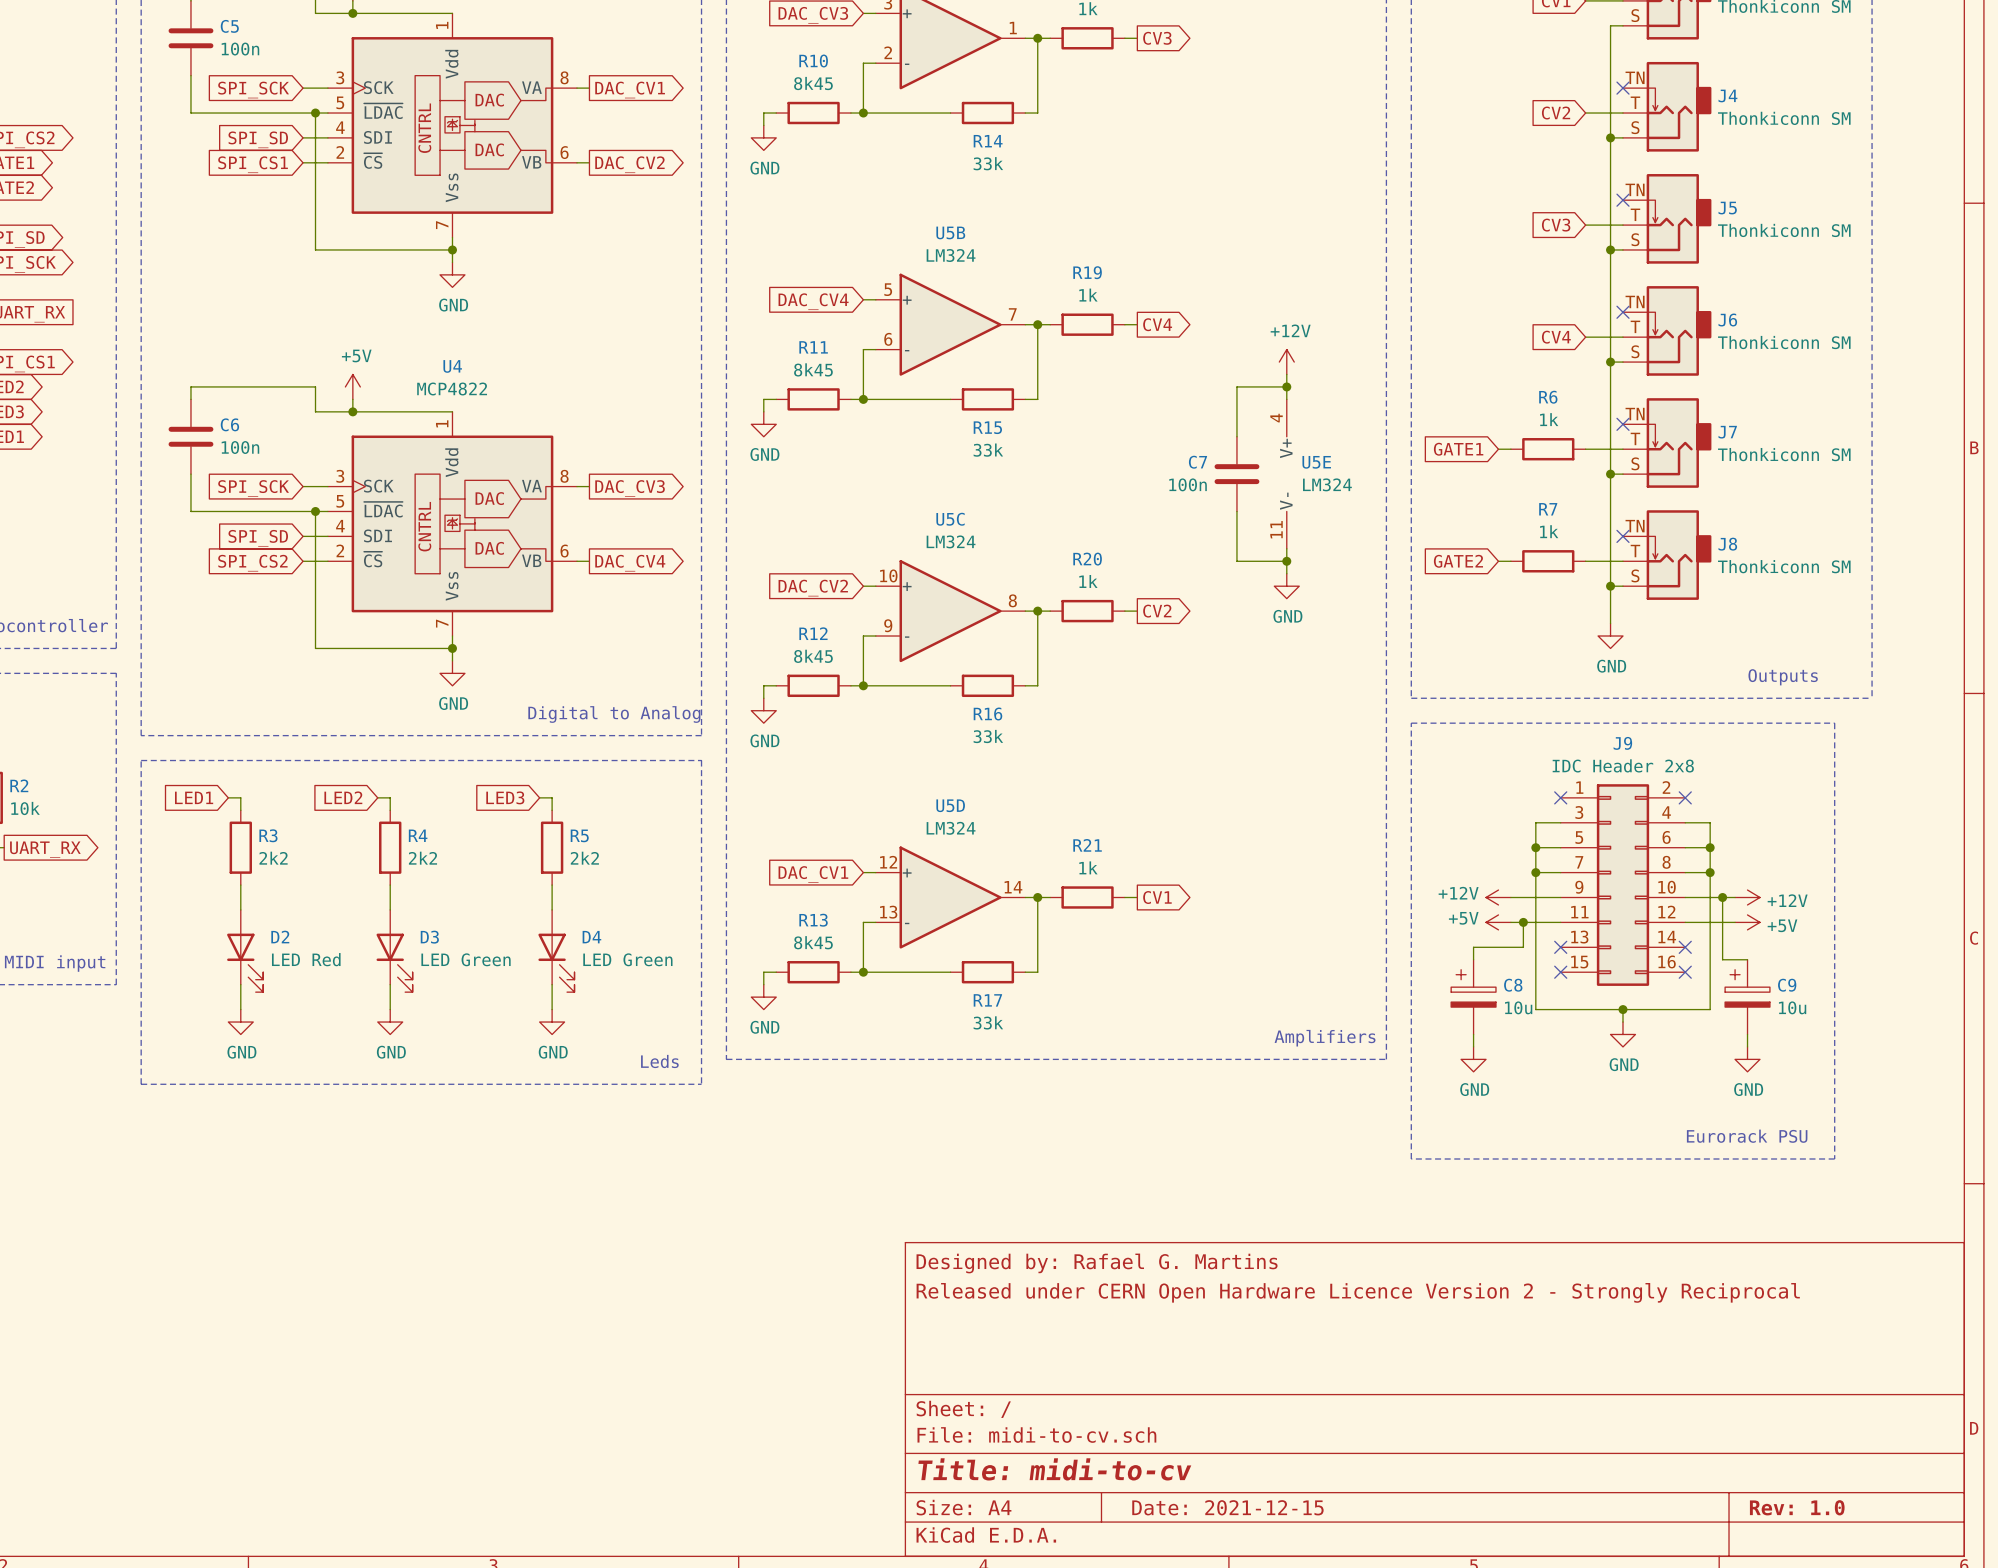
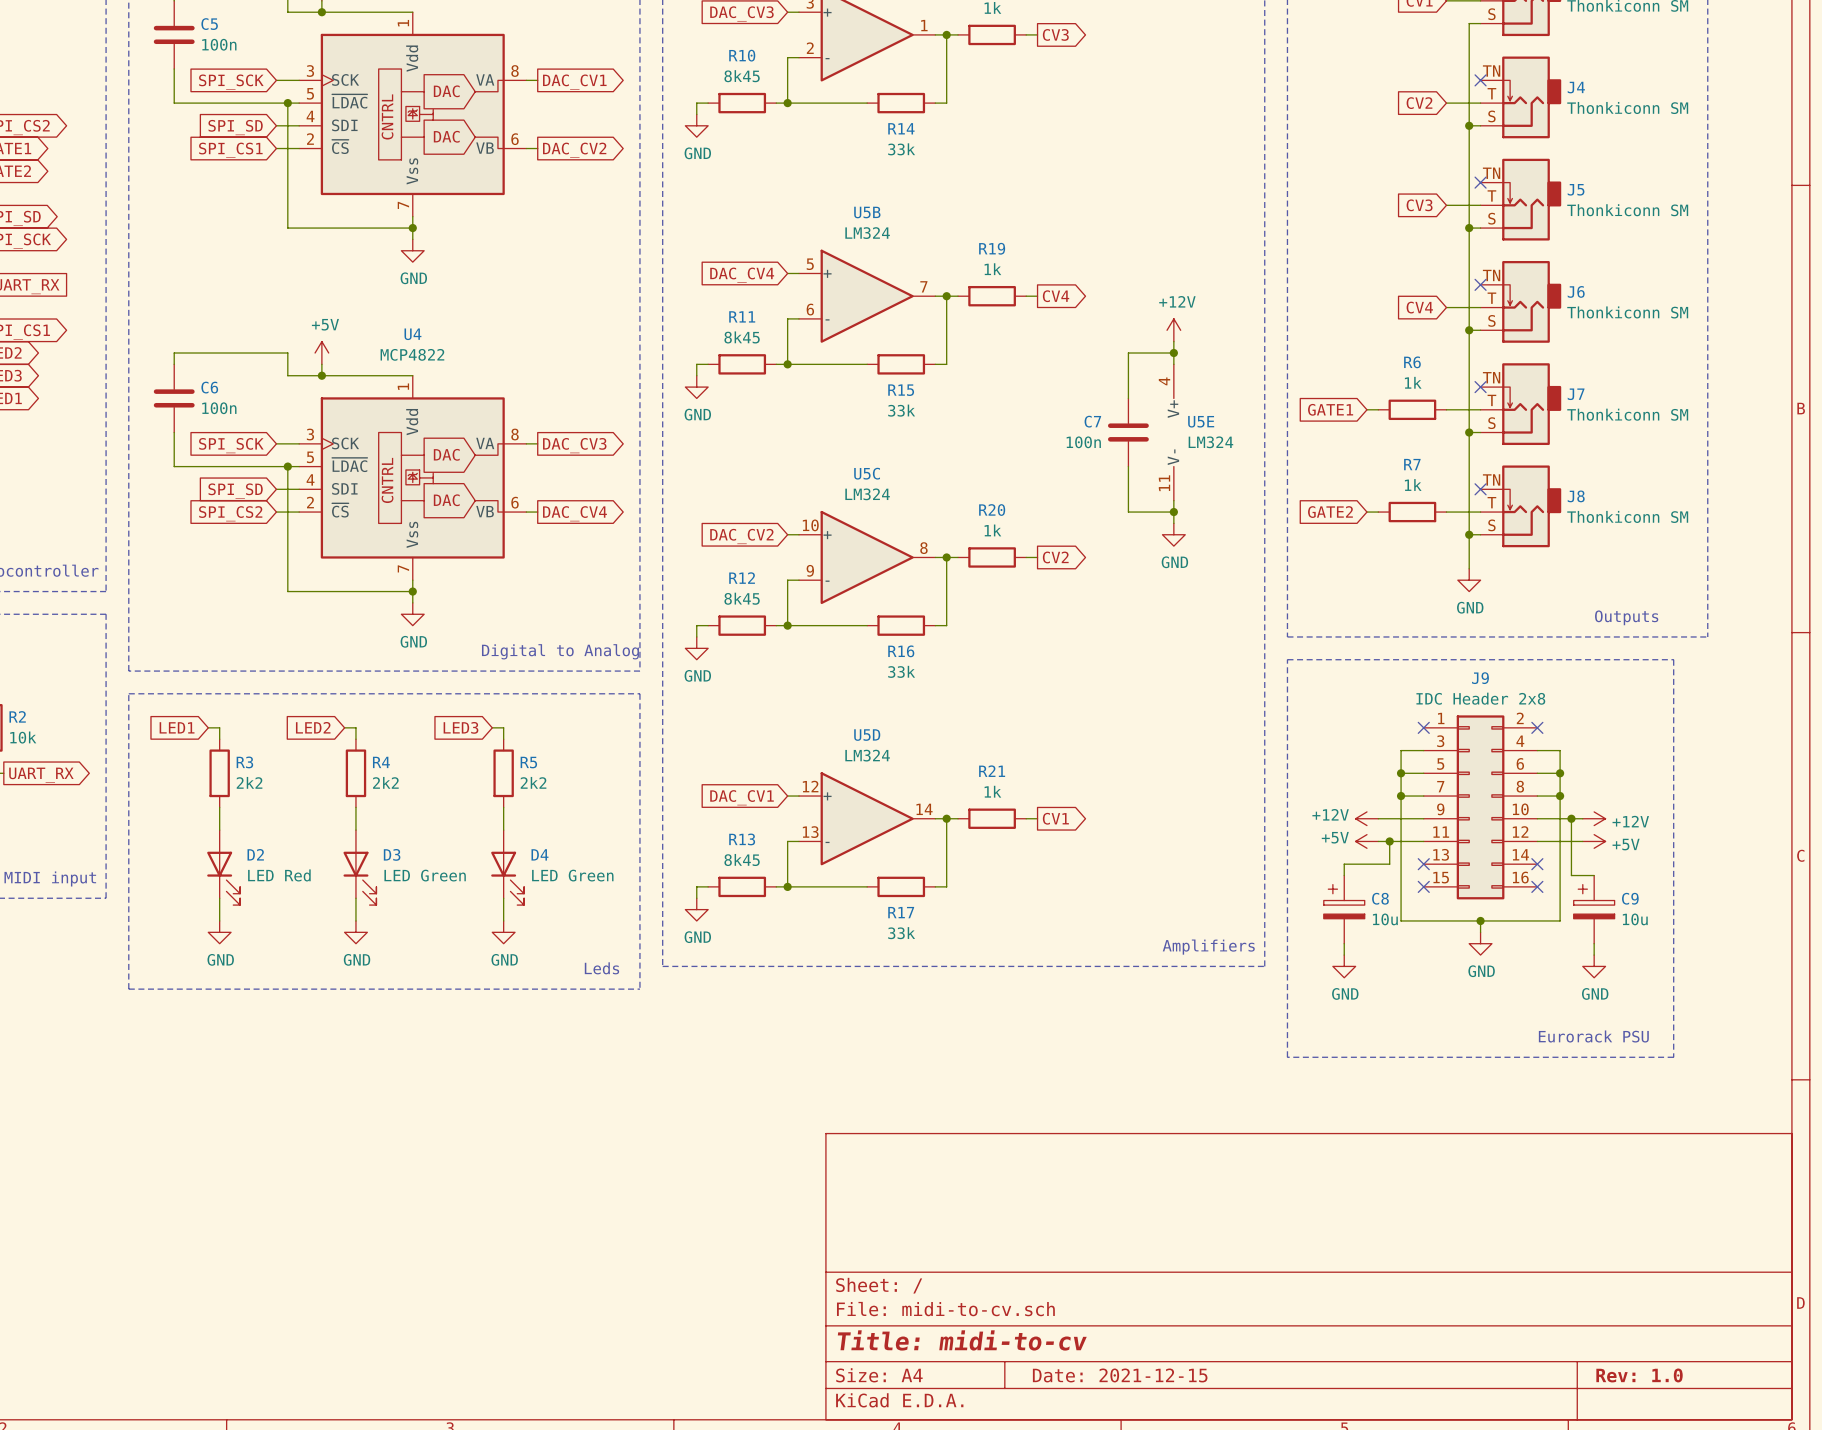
title block: Designed by: Rafael G. Martins (1097, 1263) -> none
title block: Released under CERN Open Hardware Licence Version 2 - Strongly Reciprocal (1358, 1292) -> none

